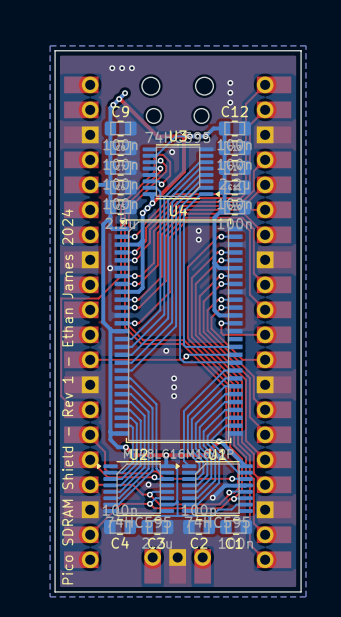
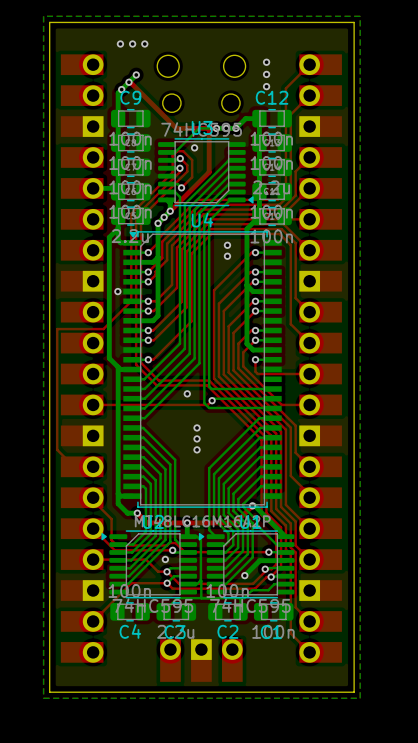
text: Pico SDRAM Shield - Rev 1 - Ethan James 2024 (67, 396) -> none

